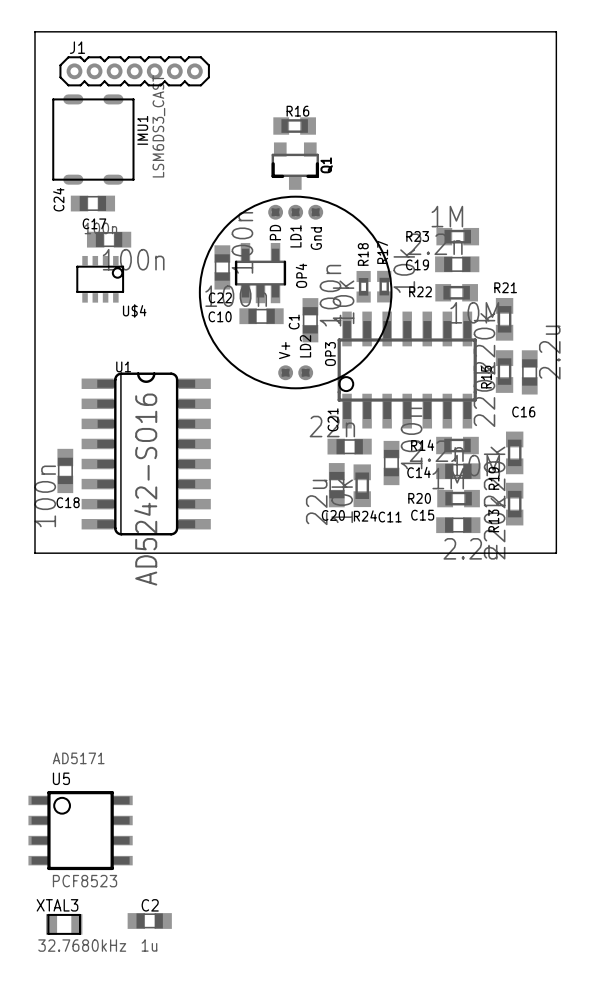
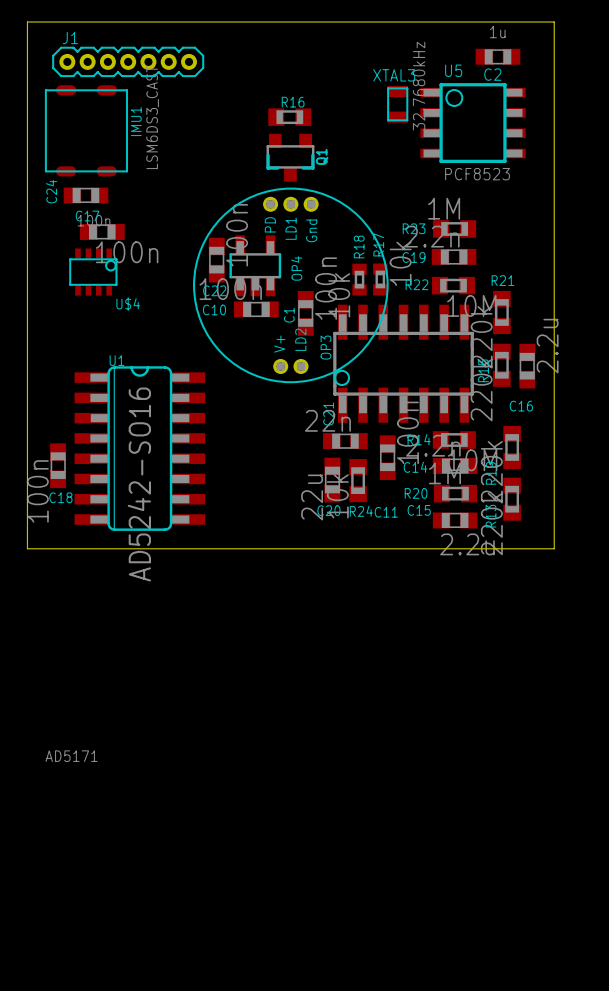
U5 position: (80, 830) -> (473, 123)
C2 name position: C2 (150, 905) -> C2 (492, 74)
C2 position: (149, 921) -> (497, 56)
XTAL3 rotation: 0° (64, 924) -> 90° clockwise (397, 104)
XTAL3 position: (64, 924) -> (397, 104)
XTAL3 value position: 32.7680kHz (82, 945) -> 32.7680kHz (419, 86)
C2 value position: 1u (149, 945) -> 1u (497, 32)

